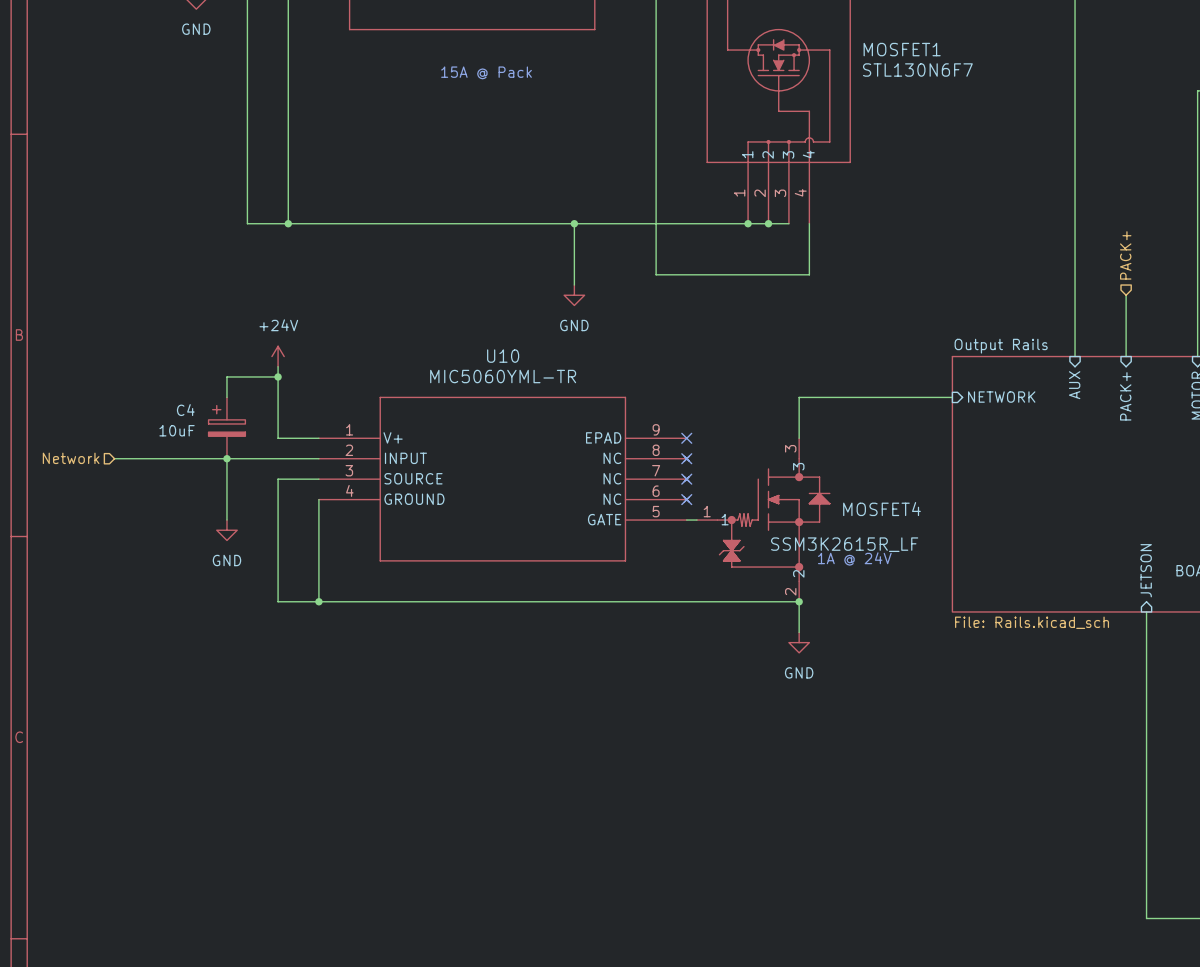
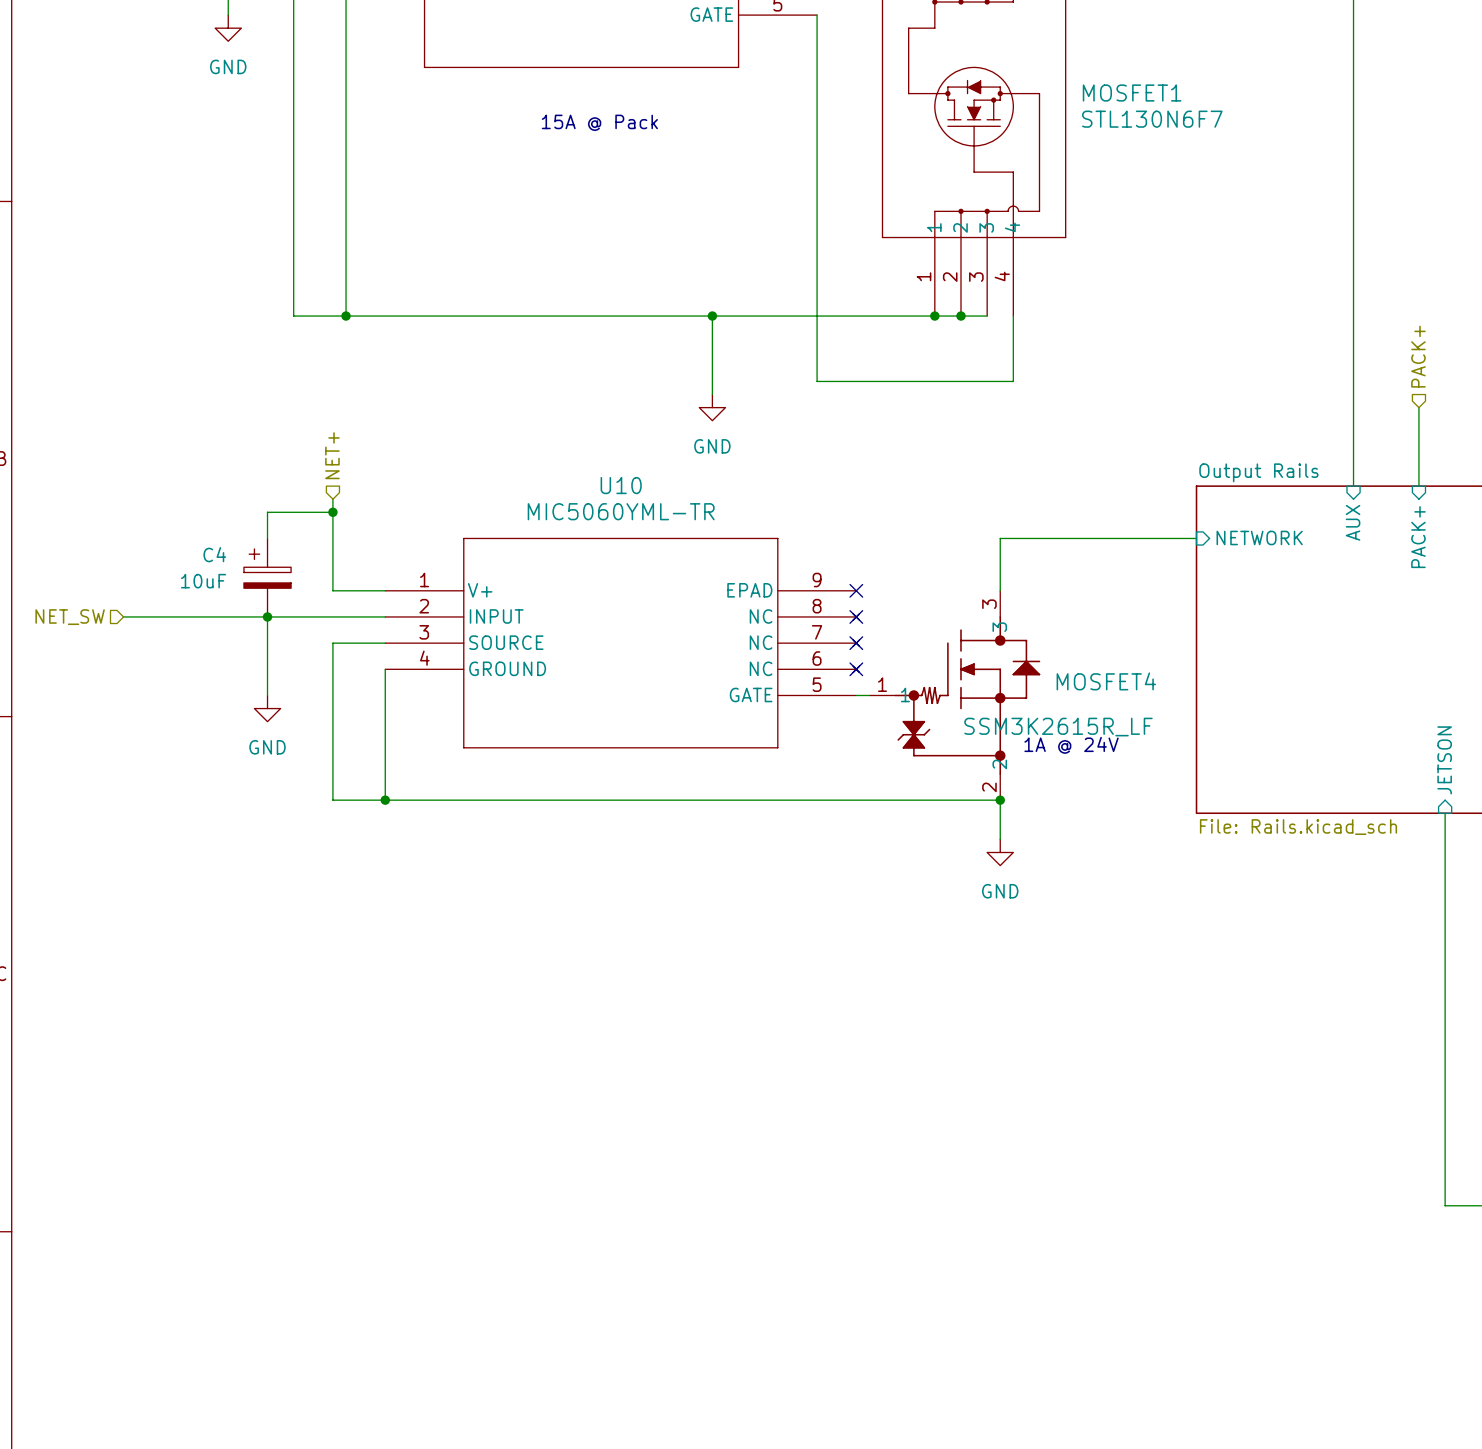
hierarchical label: none -> NET+ (332, 455)
power symbol: +24V (278, 356) -> none
hierarchical label: Network (71, 458) -> NET_SW (70, 617)

